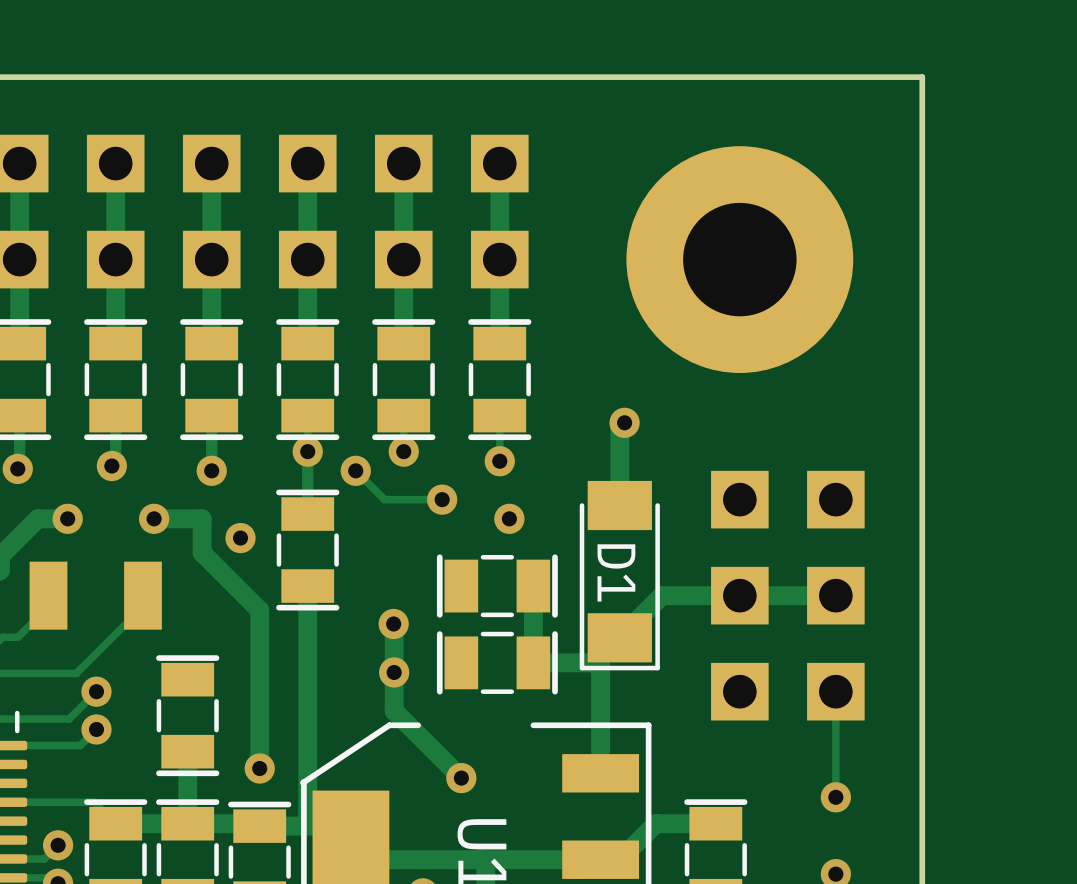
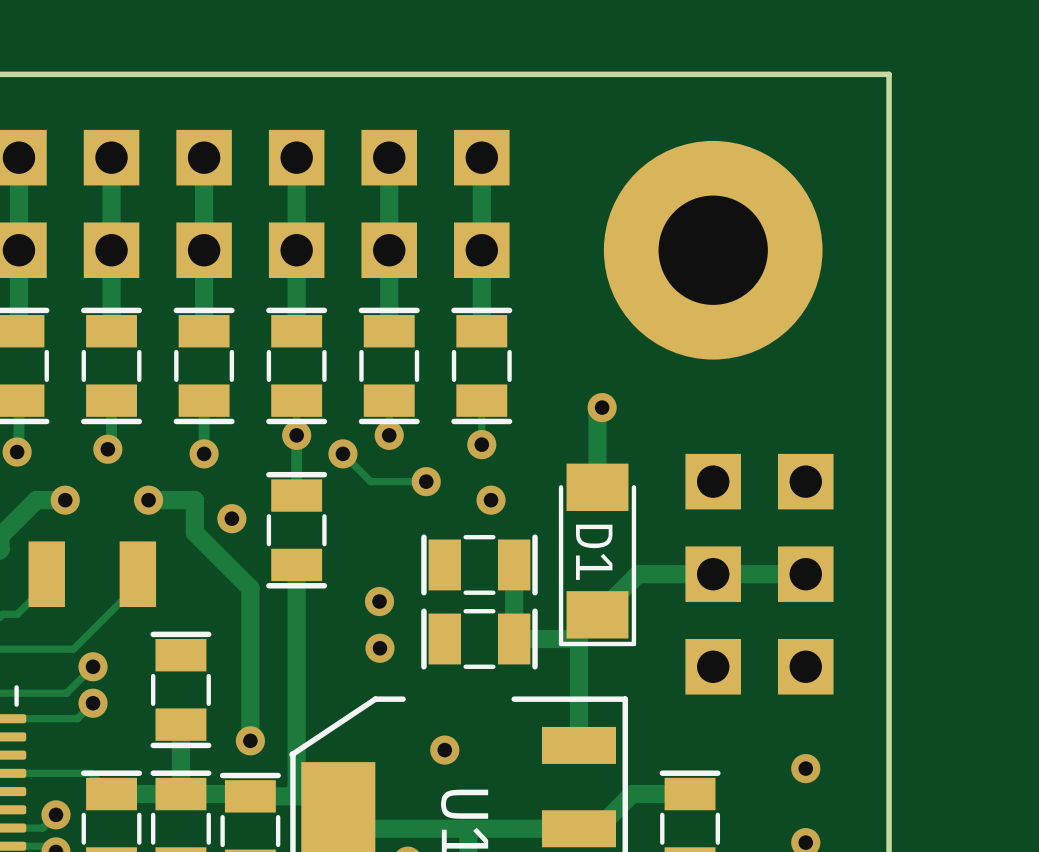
track: (394, 624) (394, 710) (461, 778) -> none
track: (835, 691) (835, 797) -> none

